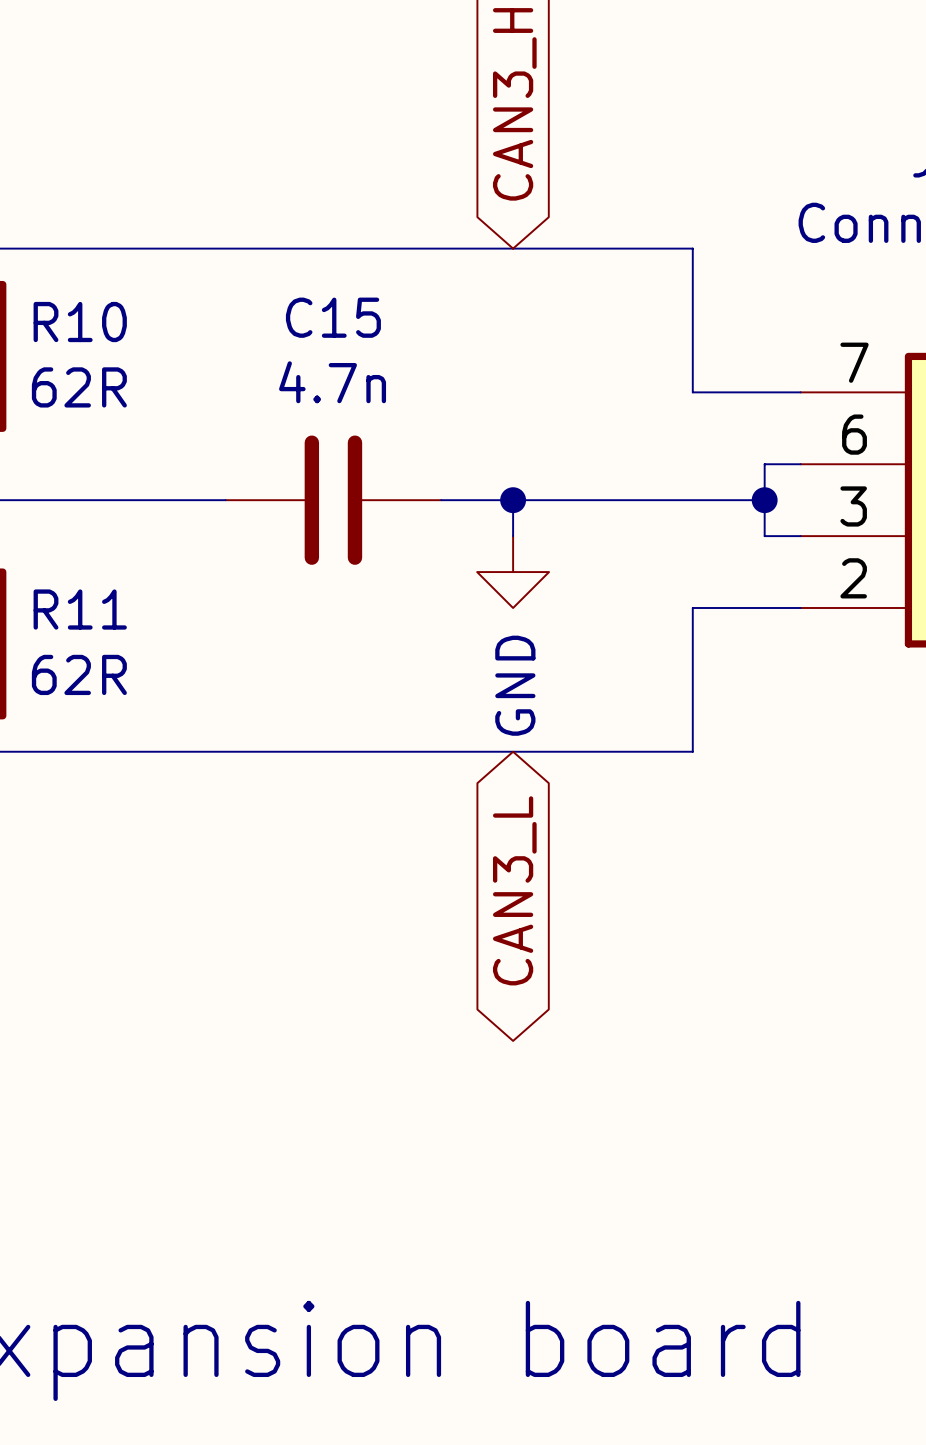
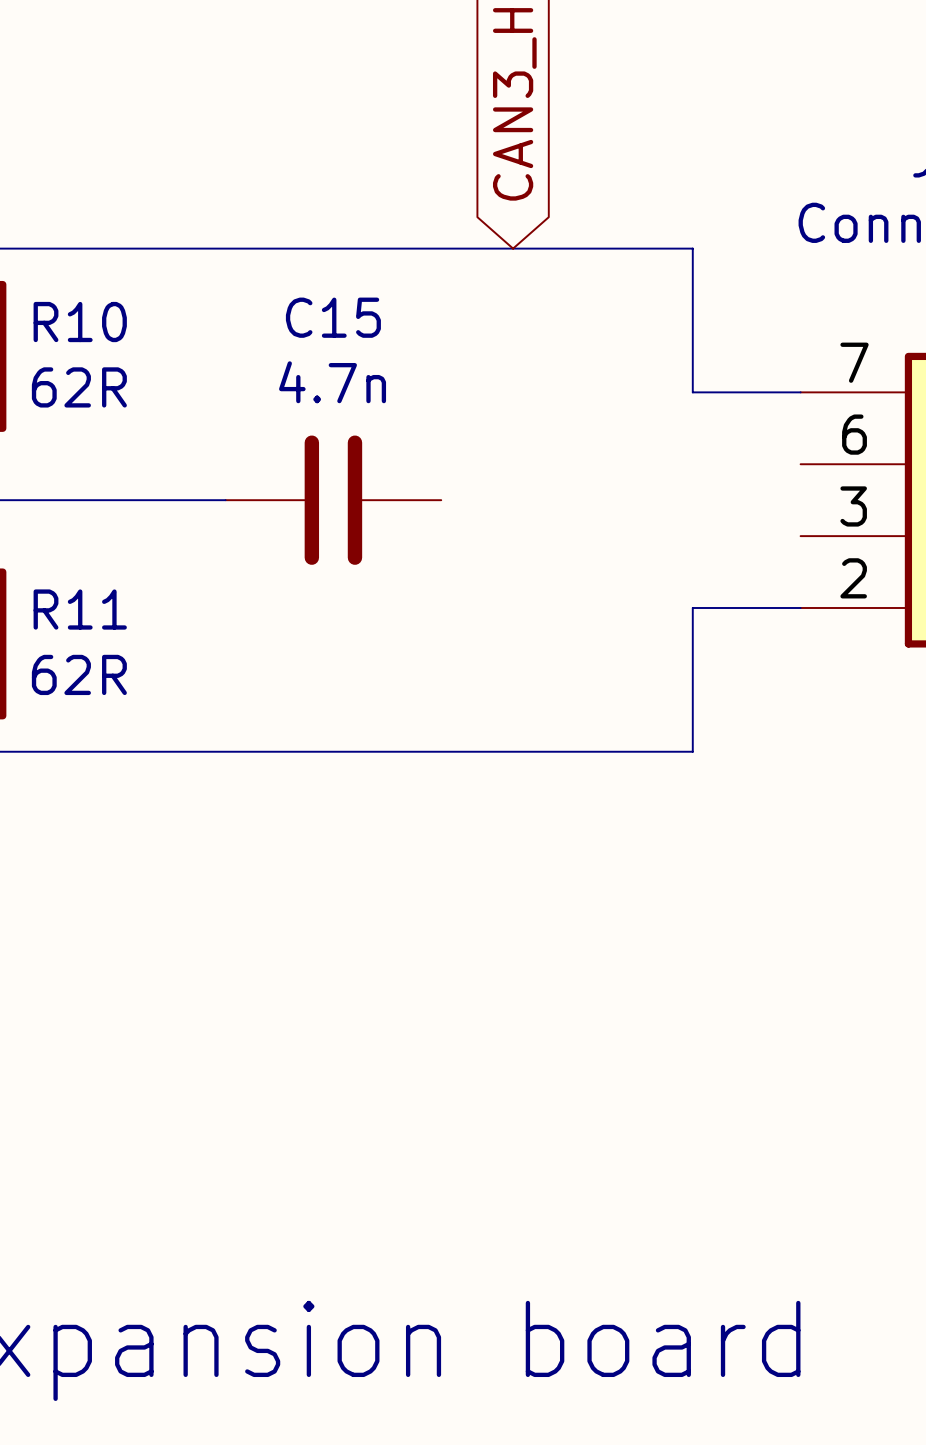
wire: (800, 464) (764, 464) (764, 536) (800, 536) -> none
wire: (441, 500) (764, 500) -> none
wire: (513, 500) (513, 536) -> none
junction: (513, 500) -> none
junction: (764, 500) -> none
power symbol: GND (513, 572) -> none
global label: CAN3_L (514, 890) -> none

